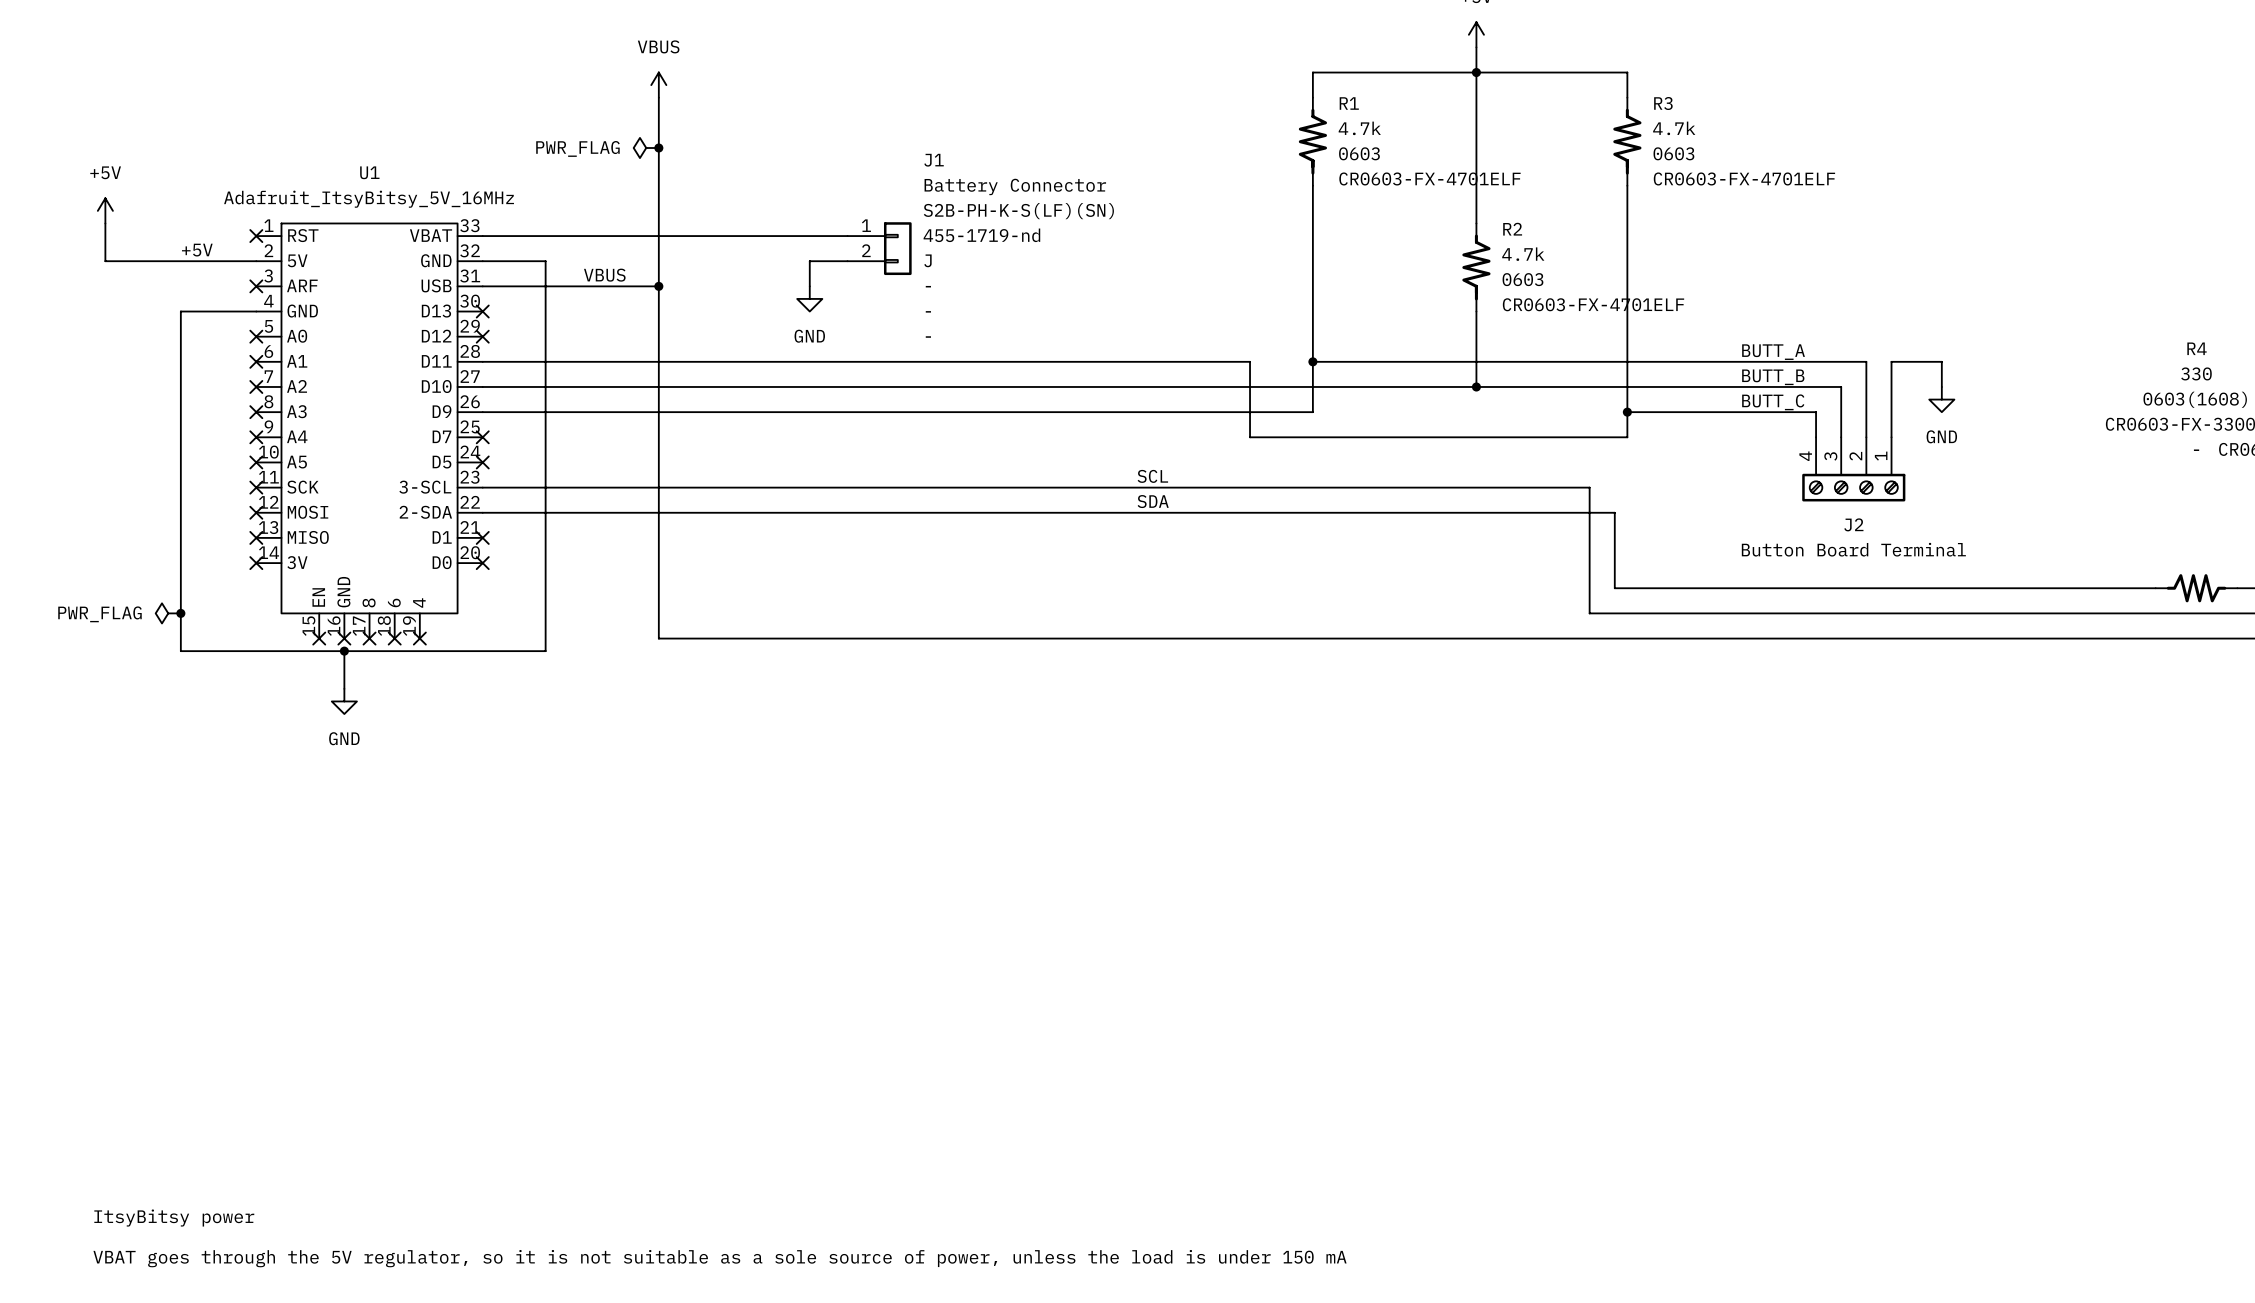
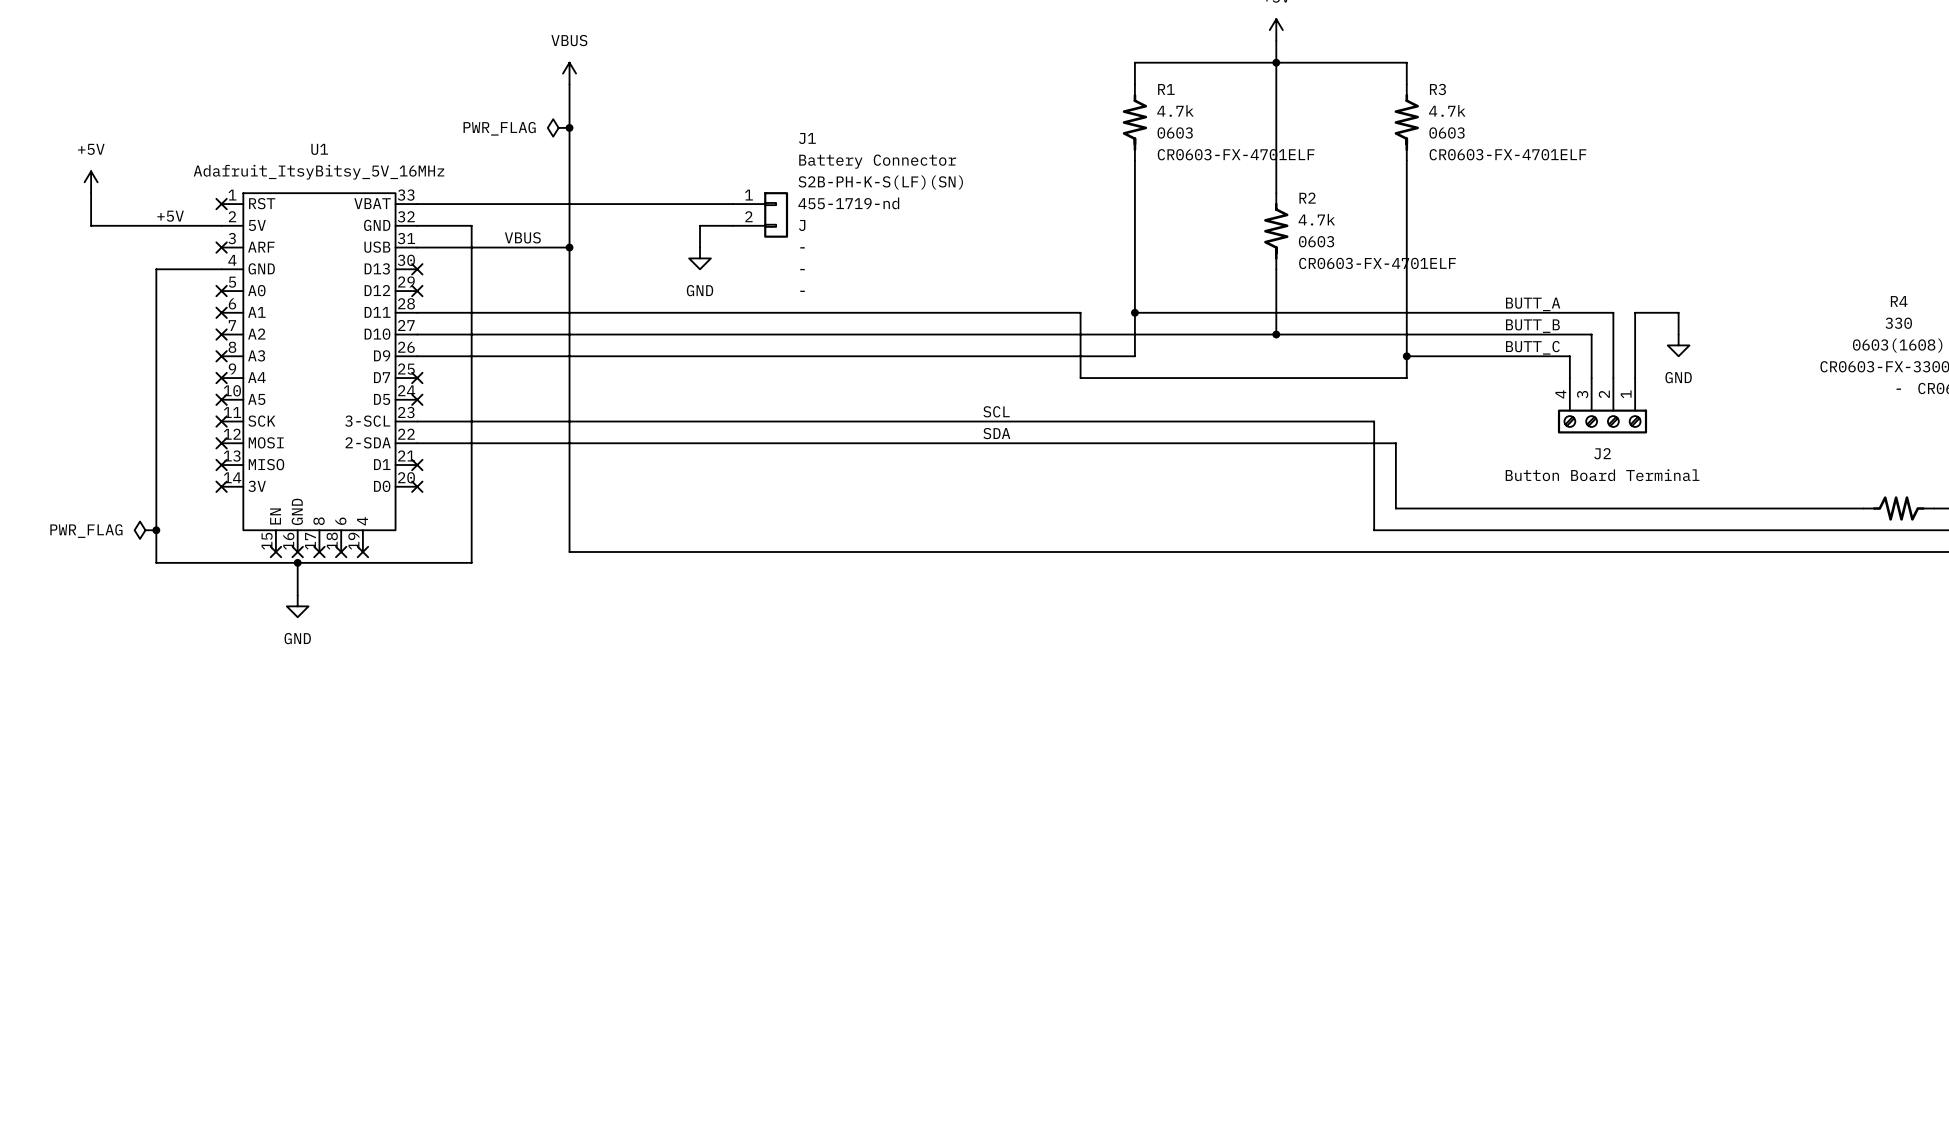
text: ItsyBitsy power (174, 1218) -> none
text: VBAT goes through the 5V regulator, so it is not suitable as a sole source of power, unless the load is under 150 mA (720, 1258) -> none

